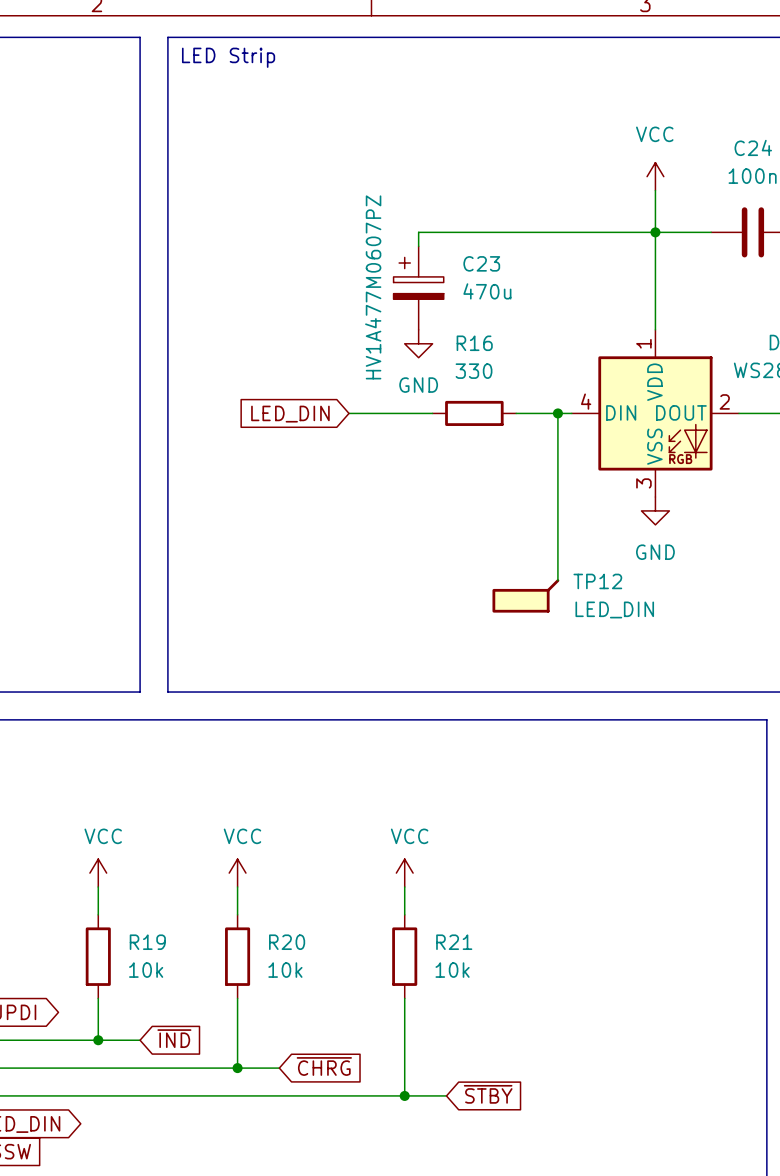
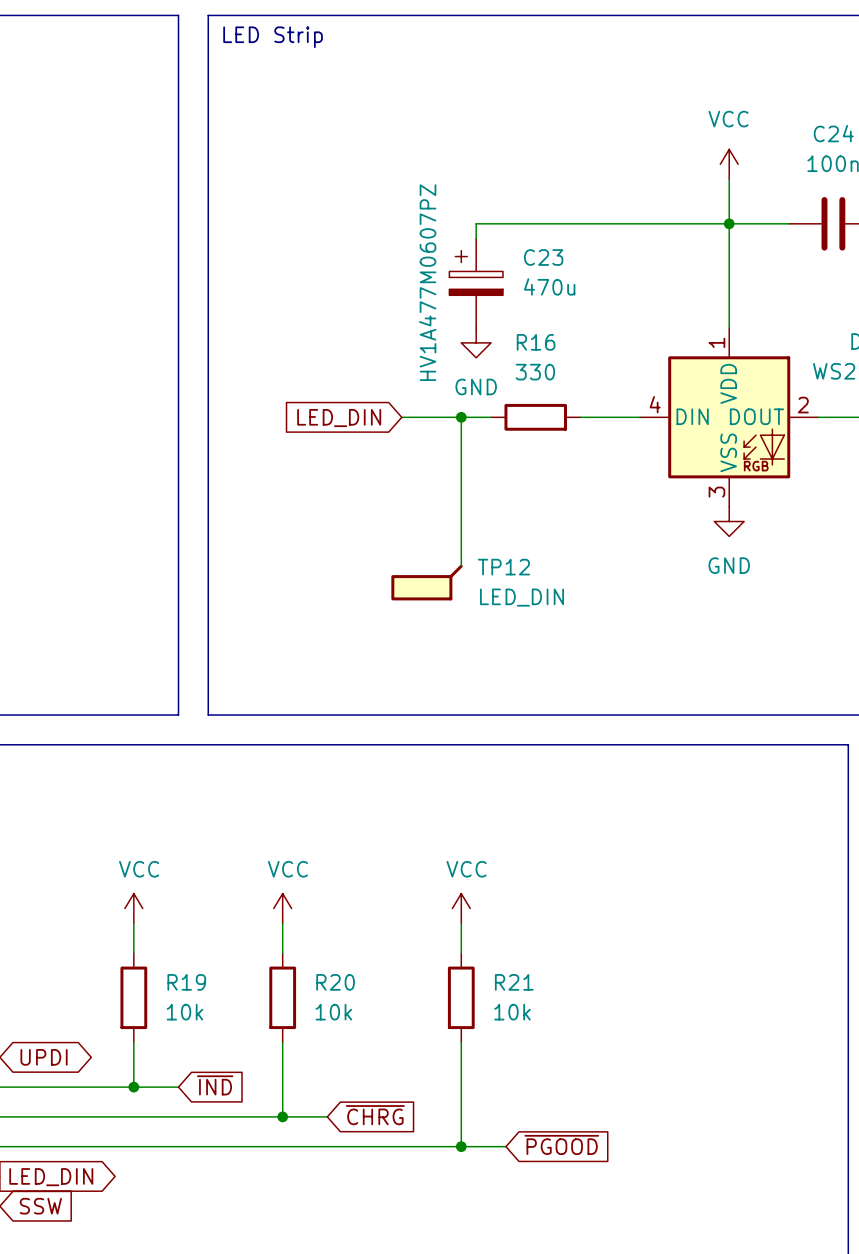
wire: none -> (461, 417) (461, 566)
junction: none -> (461, 417)
wire: (557, 413) (557, 580) -> none
junction: (557, 413) -> none
TP12 position: (525, 595) -> (427, 582)
global label: ~{STBY} (488, 1094) -> ~{PGOOD} (561, 1144)

